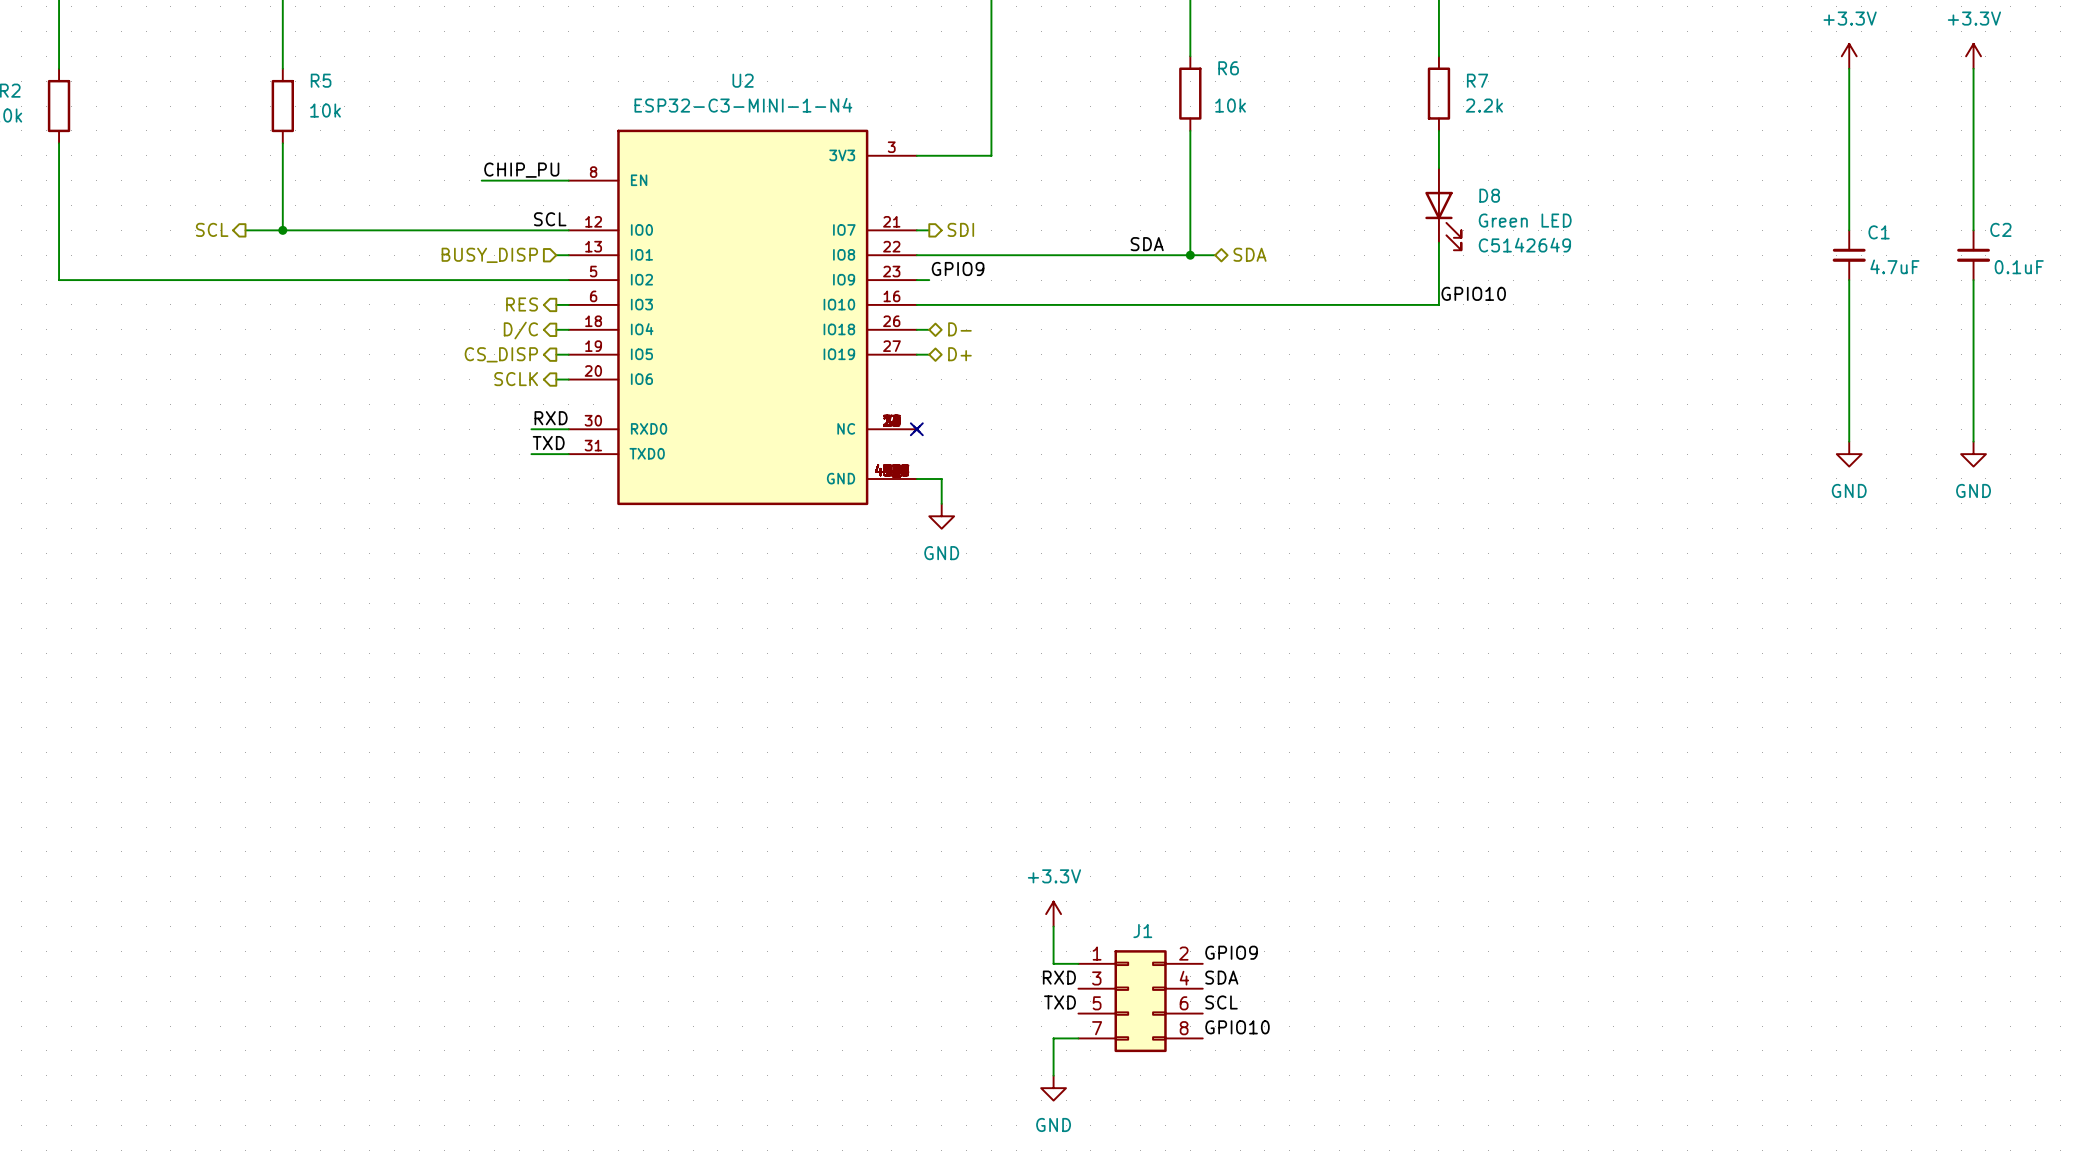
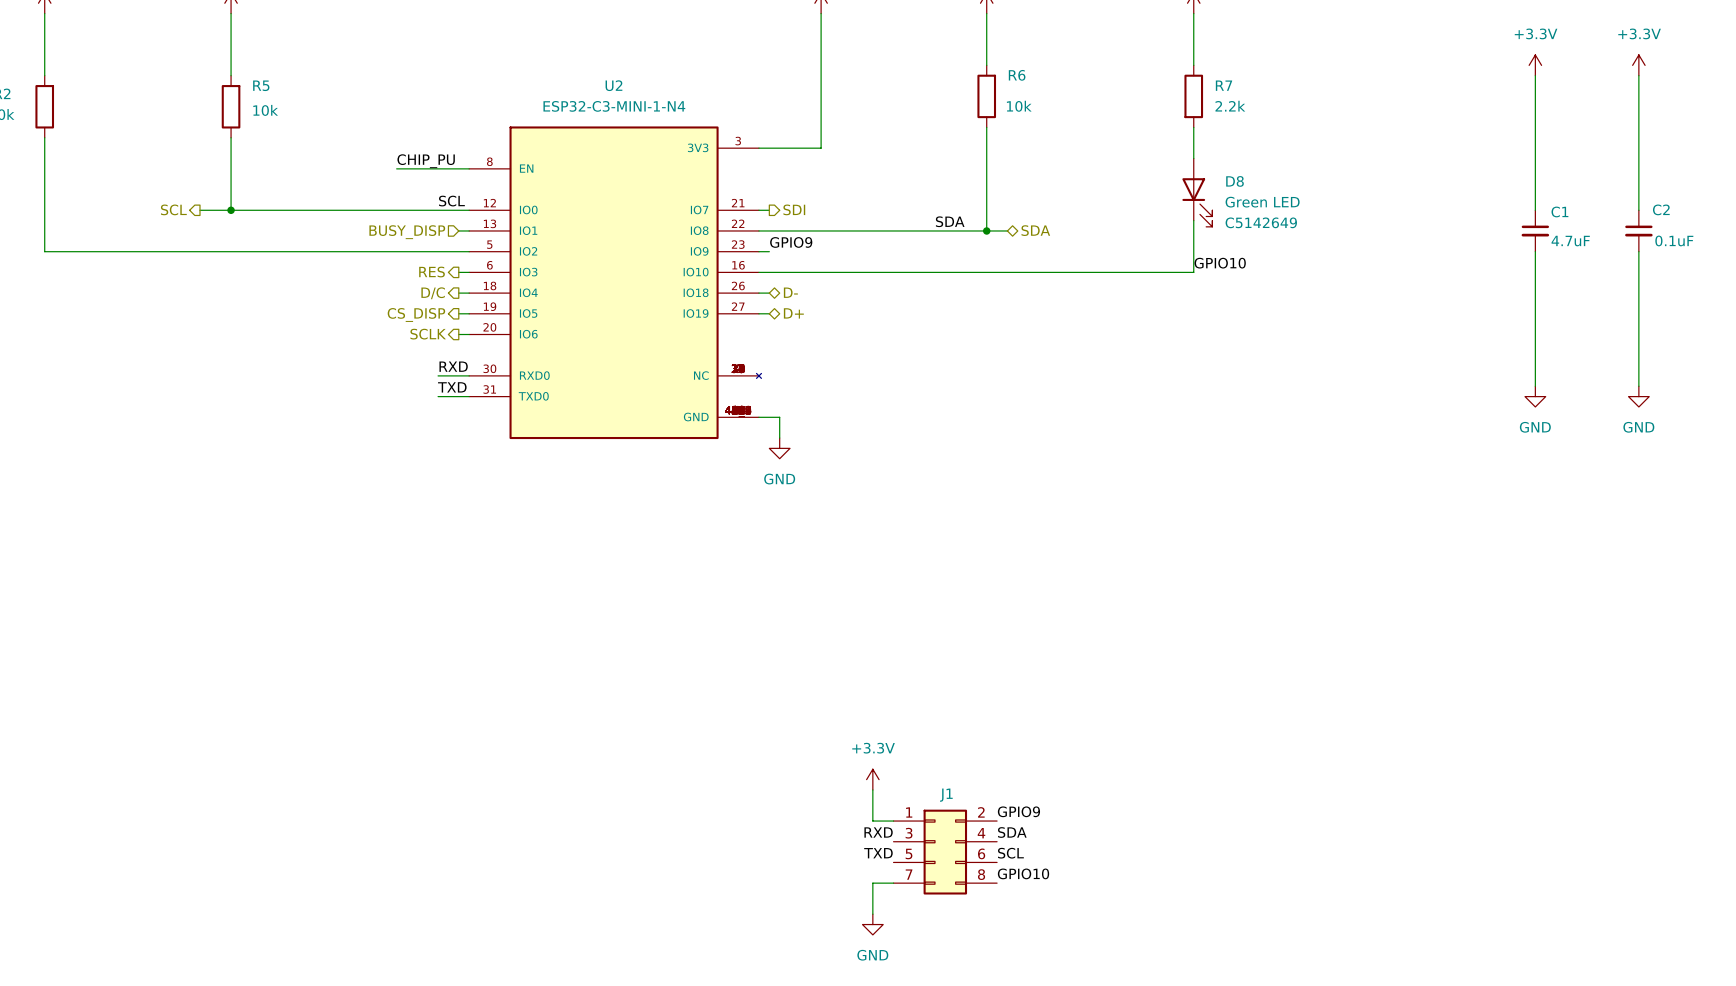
no-connect mark: (916, 429) -> none

